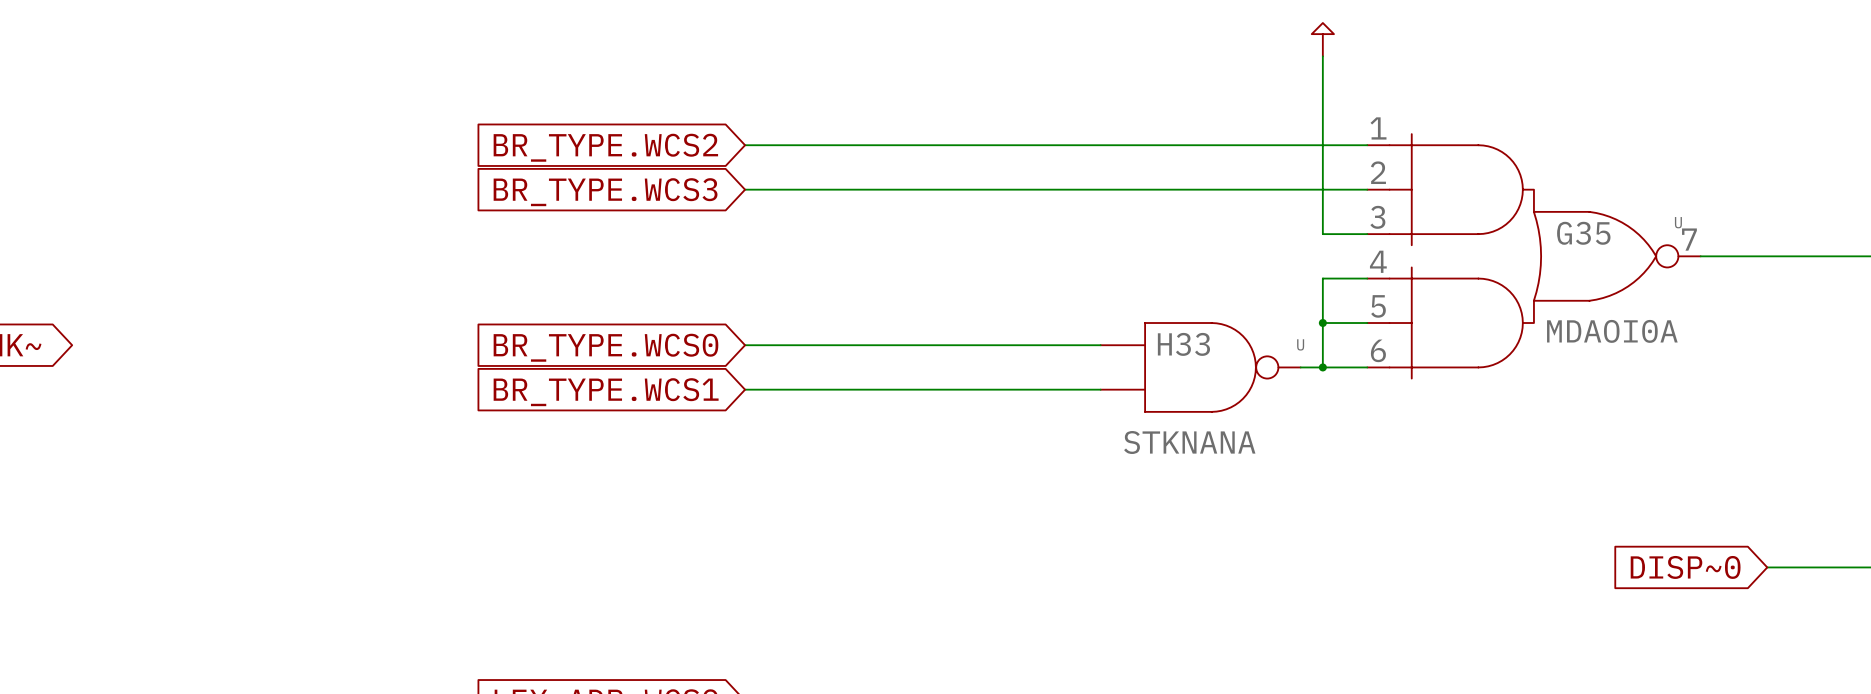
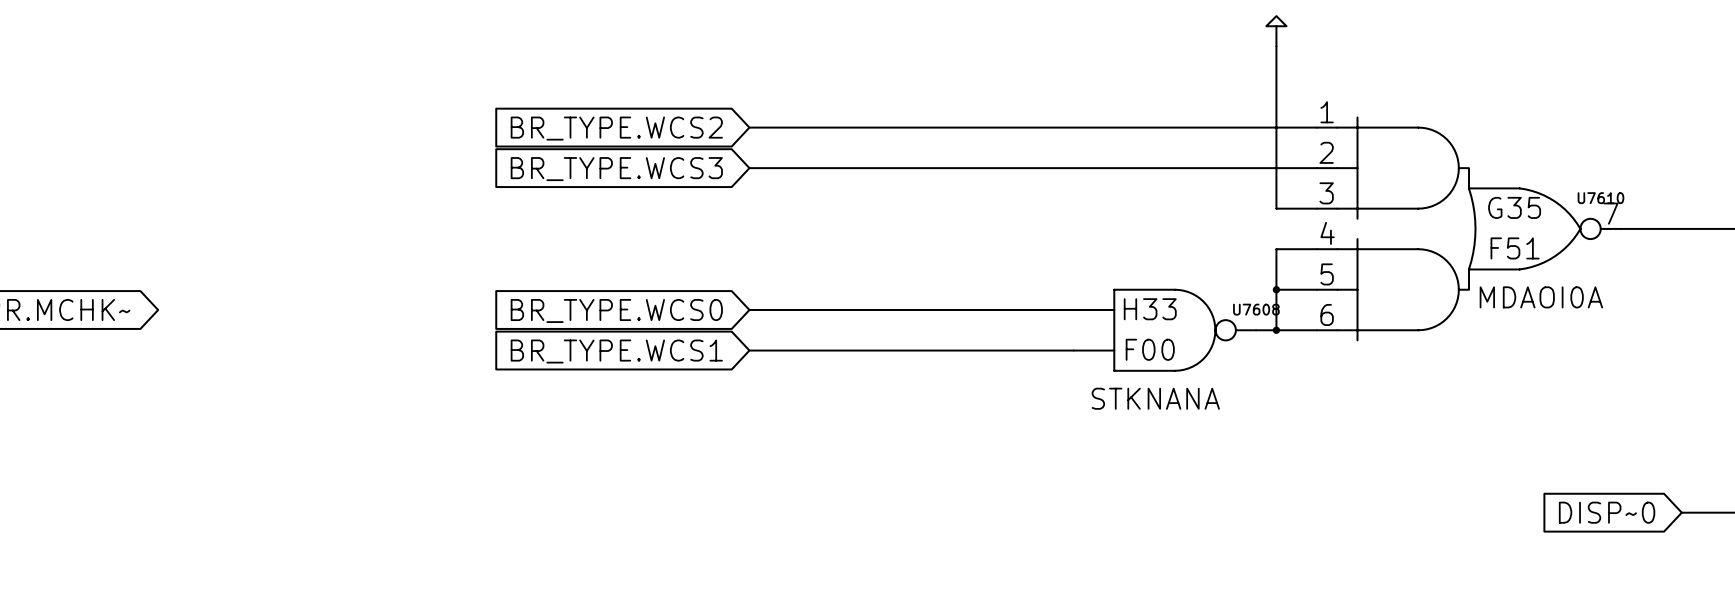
U name: U (1678, 222) -> U7610 (1600, 198)
U value: none -> F51 (1515, 248)
U name: U (1300, 344) -> U7608 (1256, 309)
U value: none -> F00 (1150, 349)

